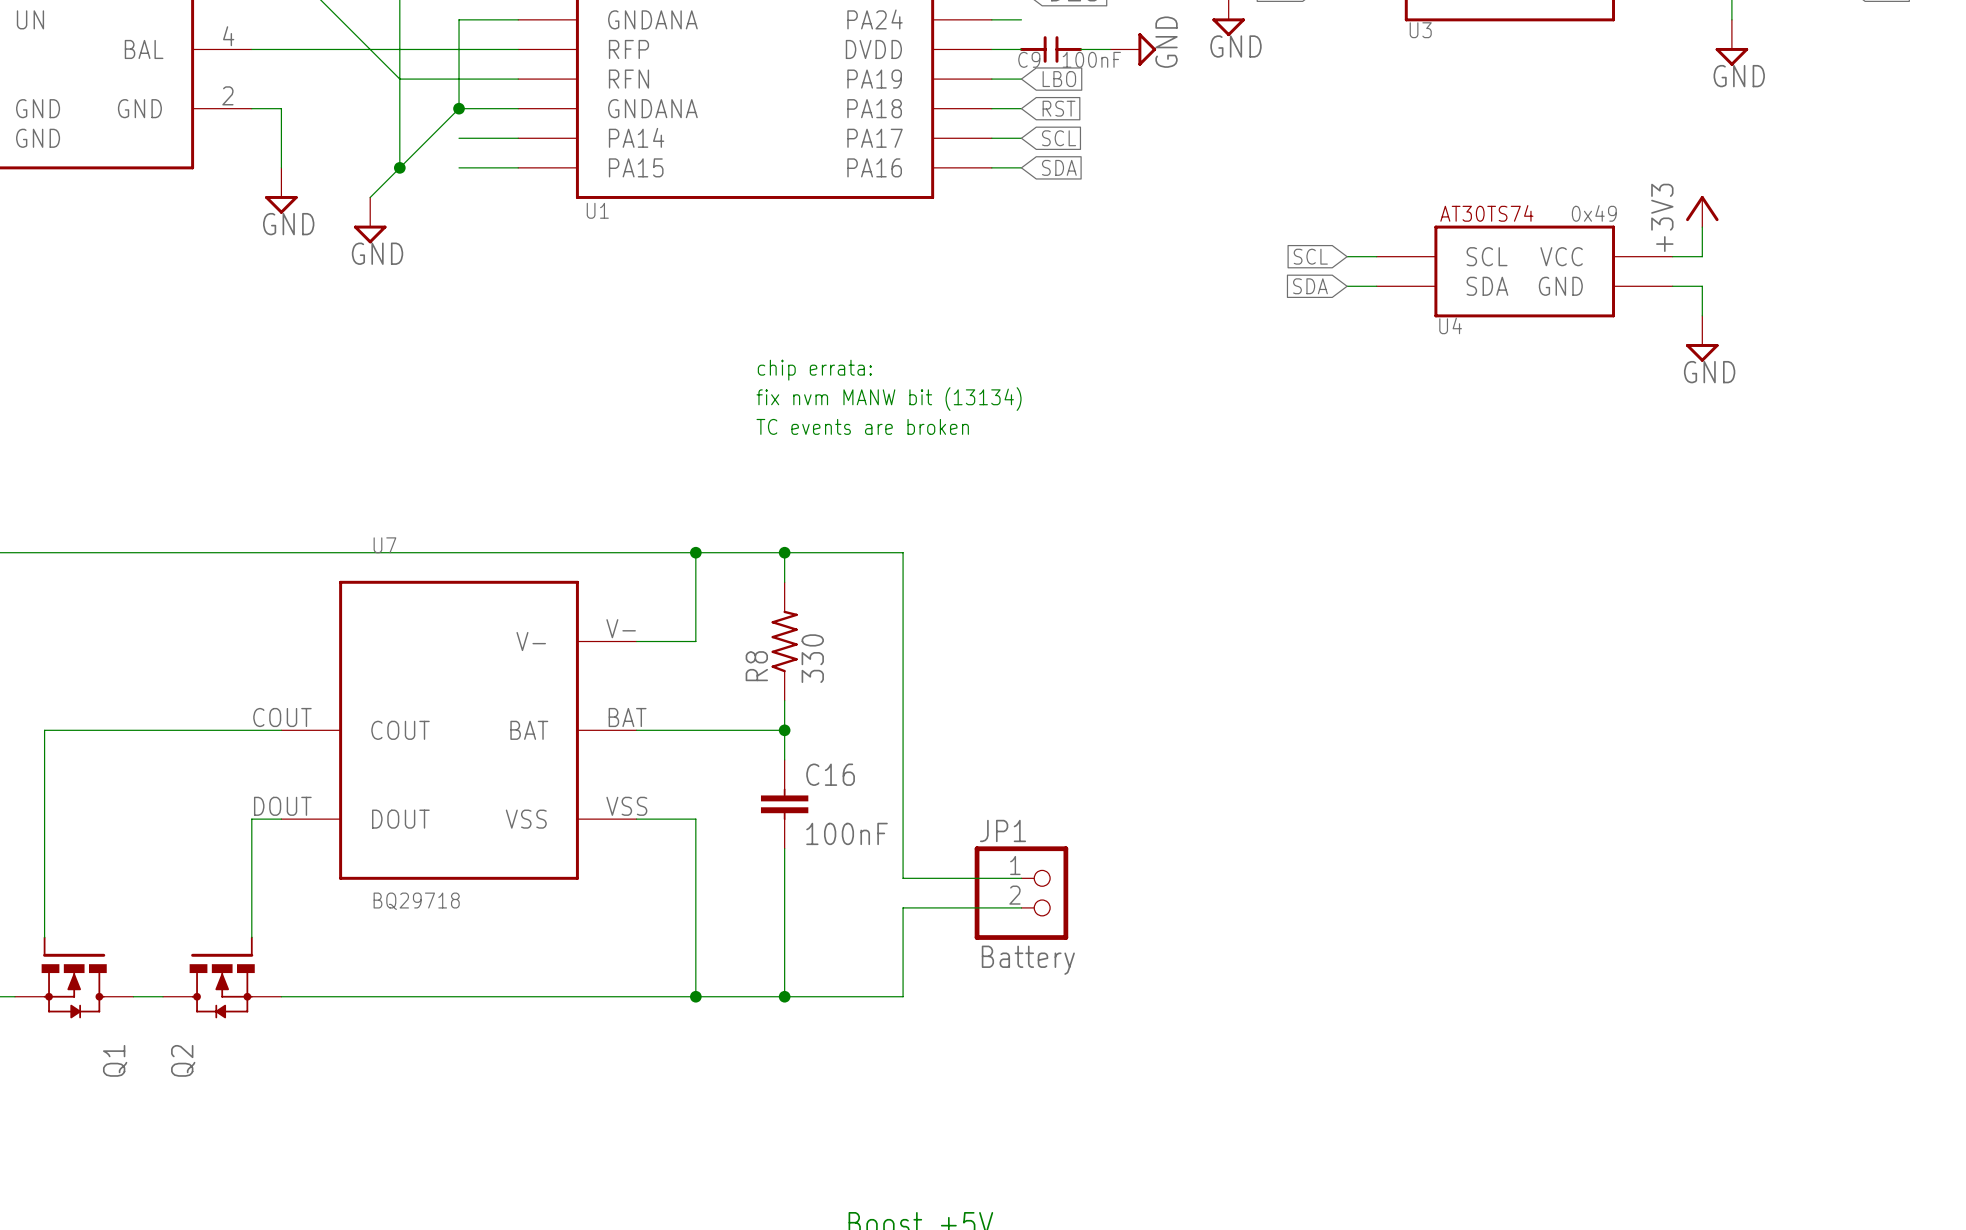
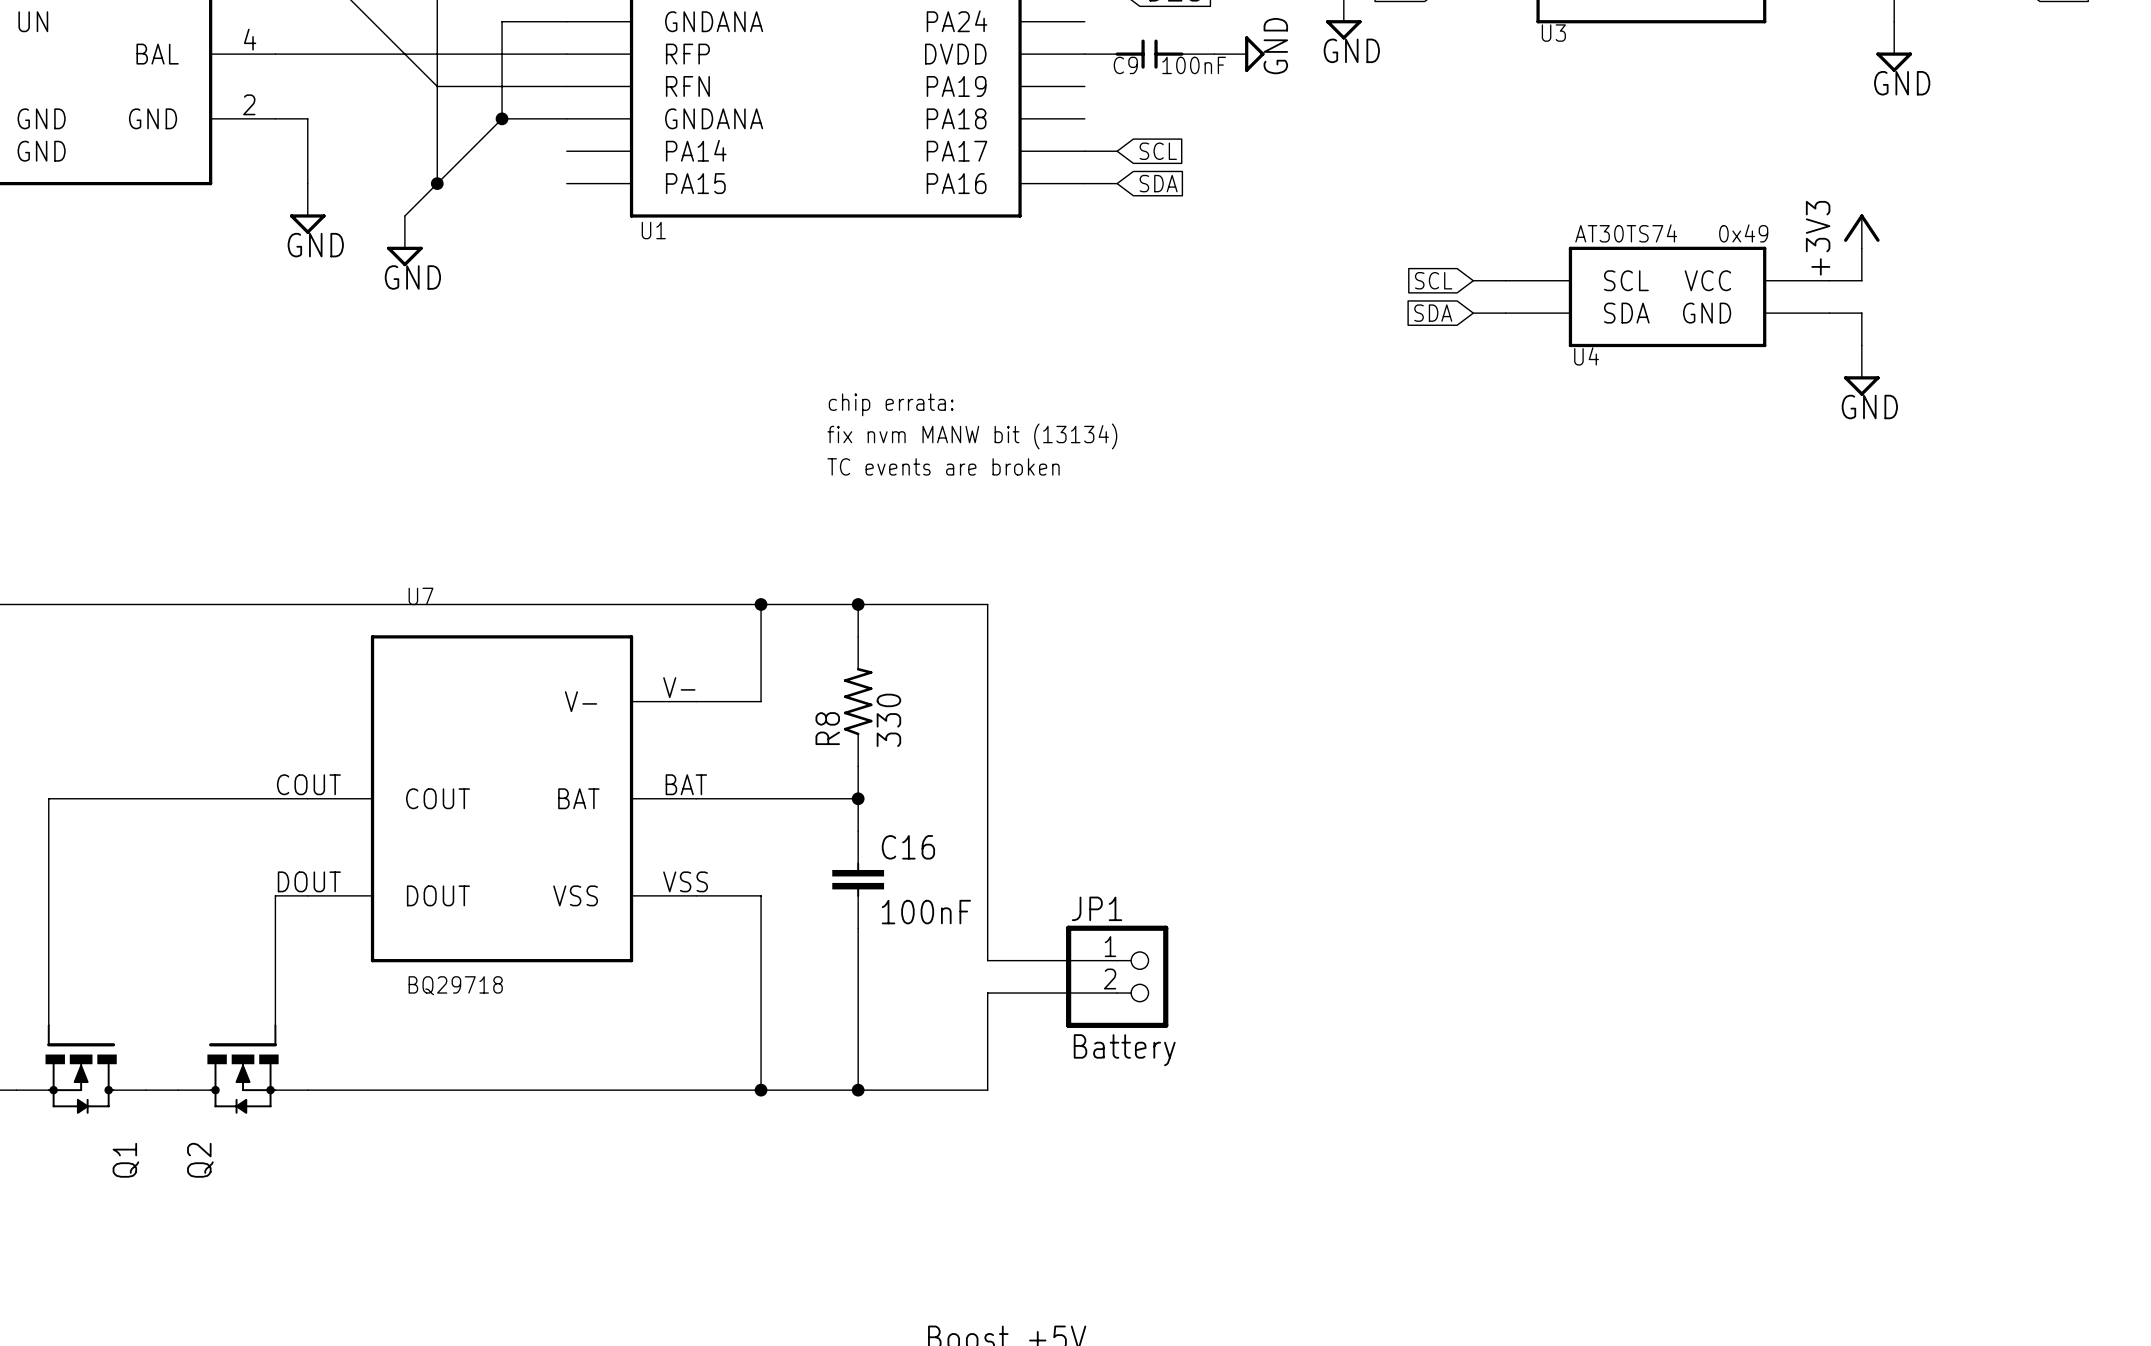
wire: (991, 19) (1021, 19) -> none
wire: (991, 79) (1021, 79) -> none
global label: LBO (1059, 79) -> none
wire: (991, 108) (1021, 108) -> none
global label: RST (1059, 108) -> none
wire: (459, 138) (518, 138) -> none
wire: (459, 167) (518, 167) -> none

